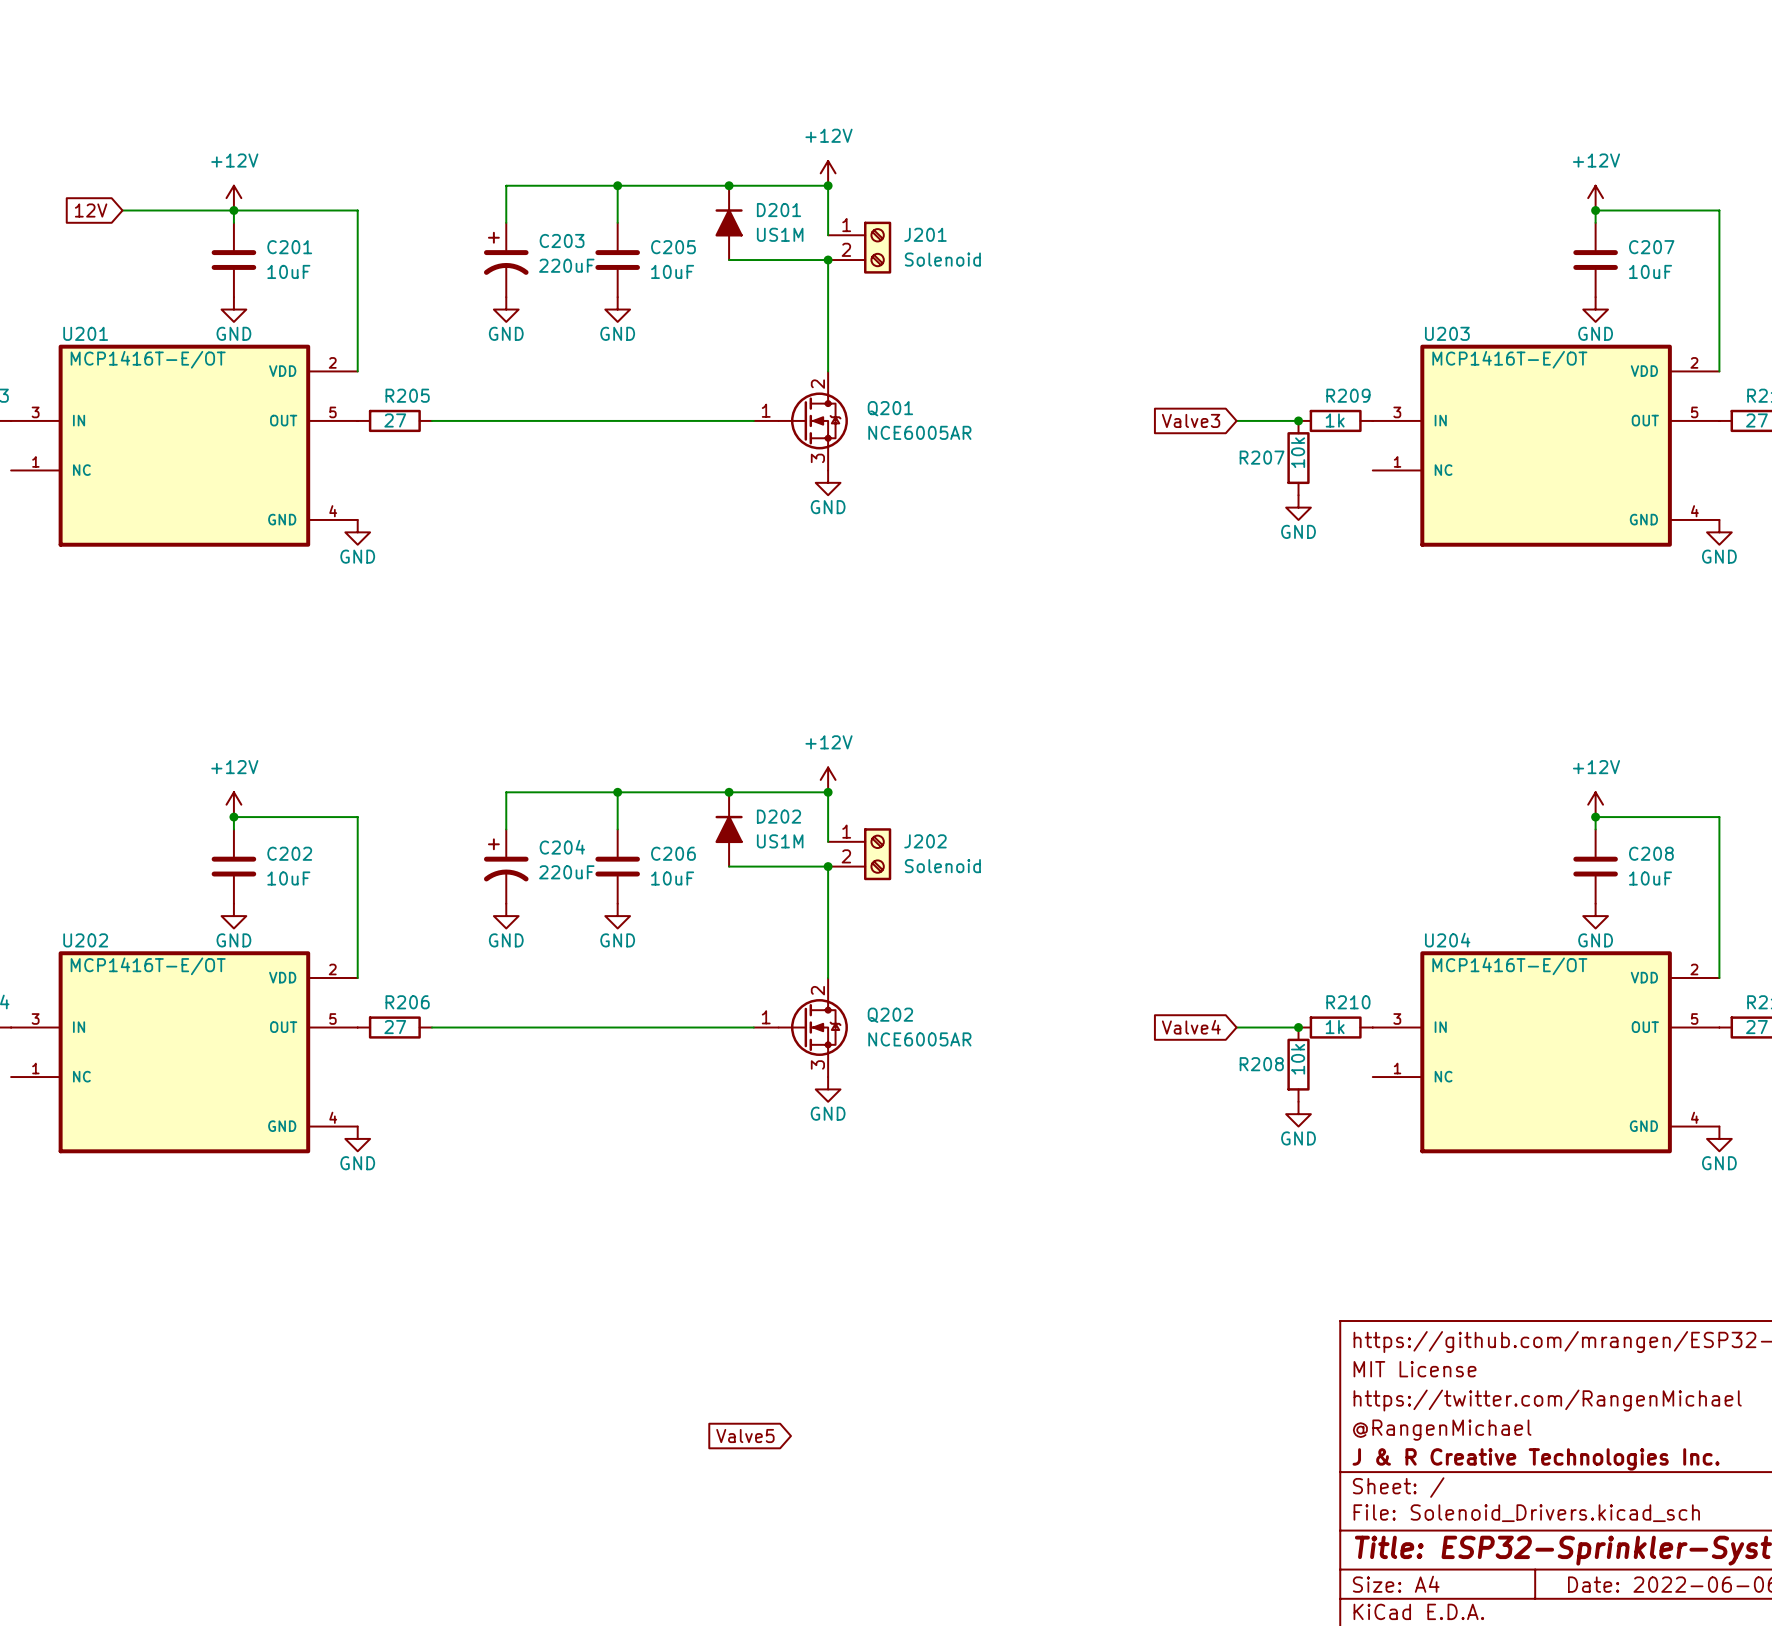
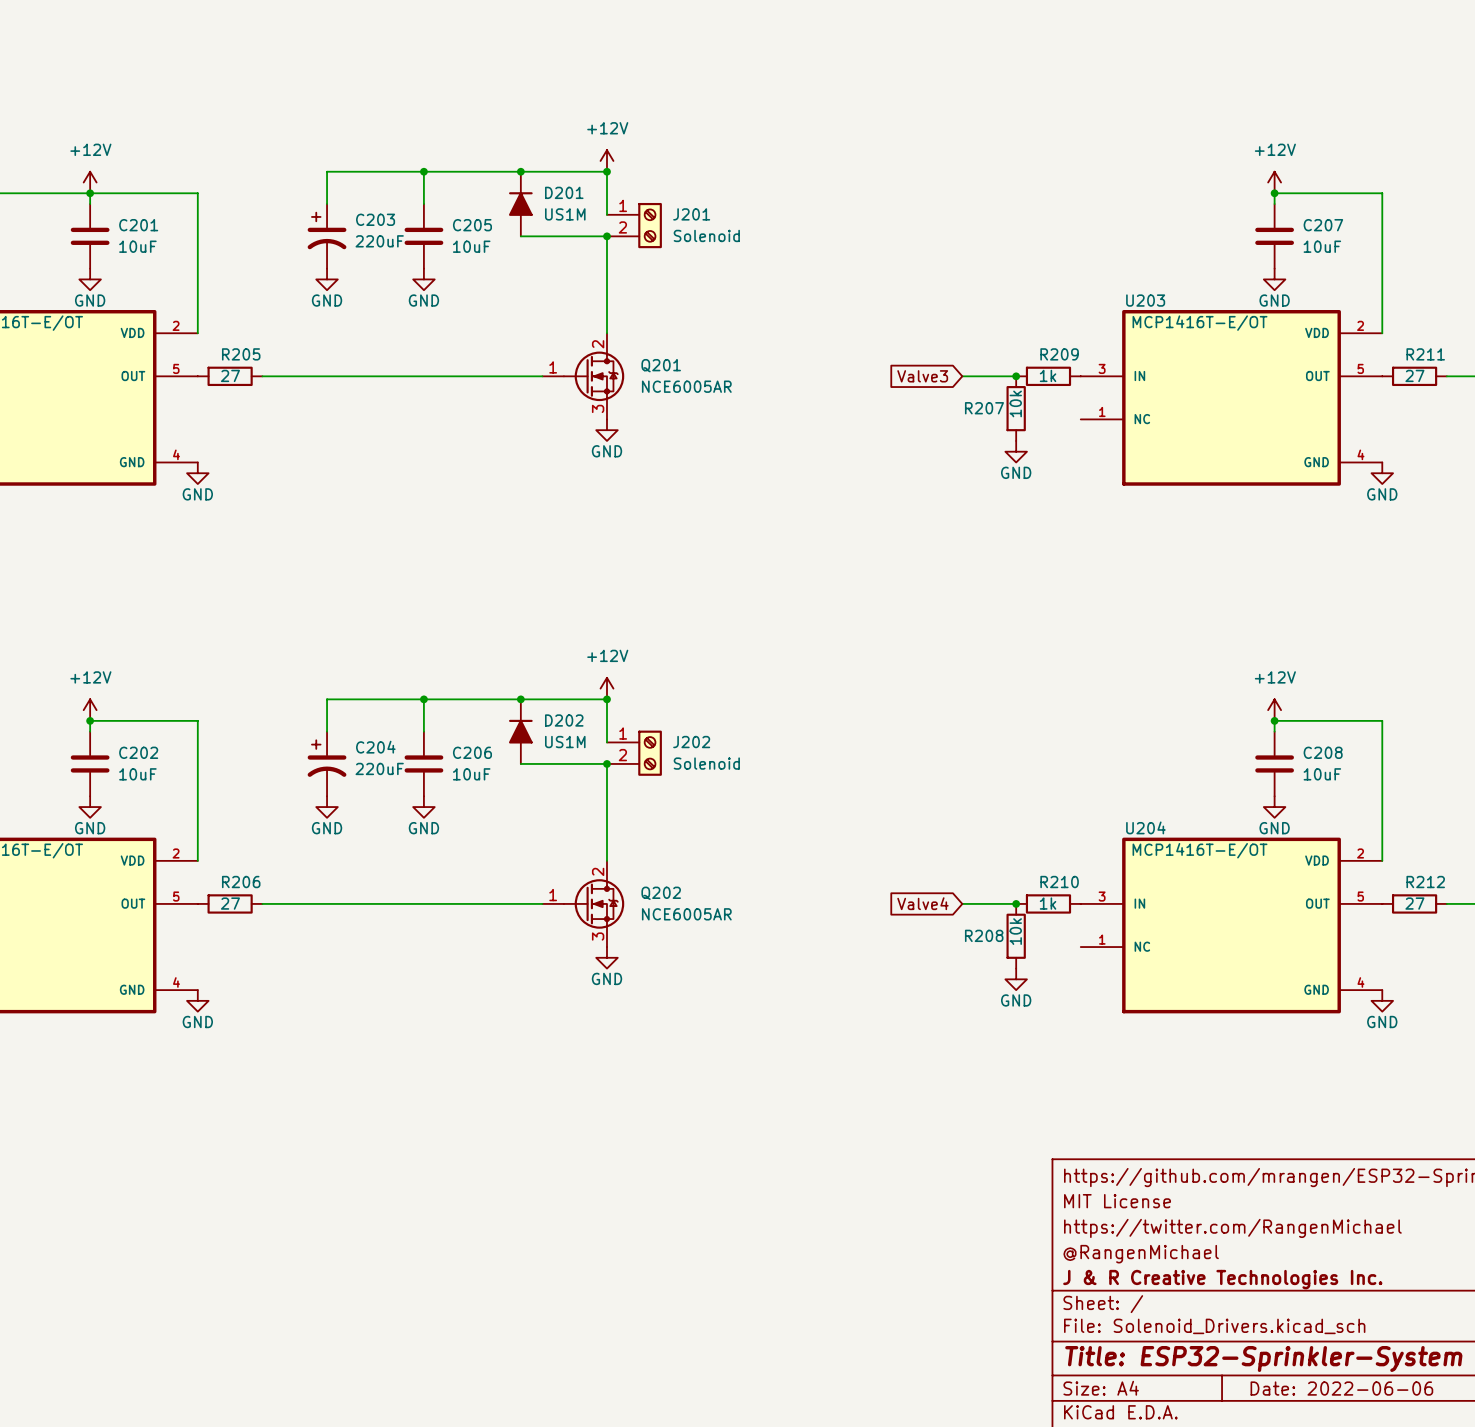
global label: Valve5 (745, 1436) -> none

